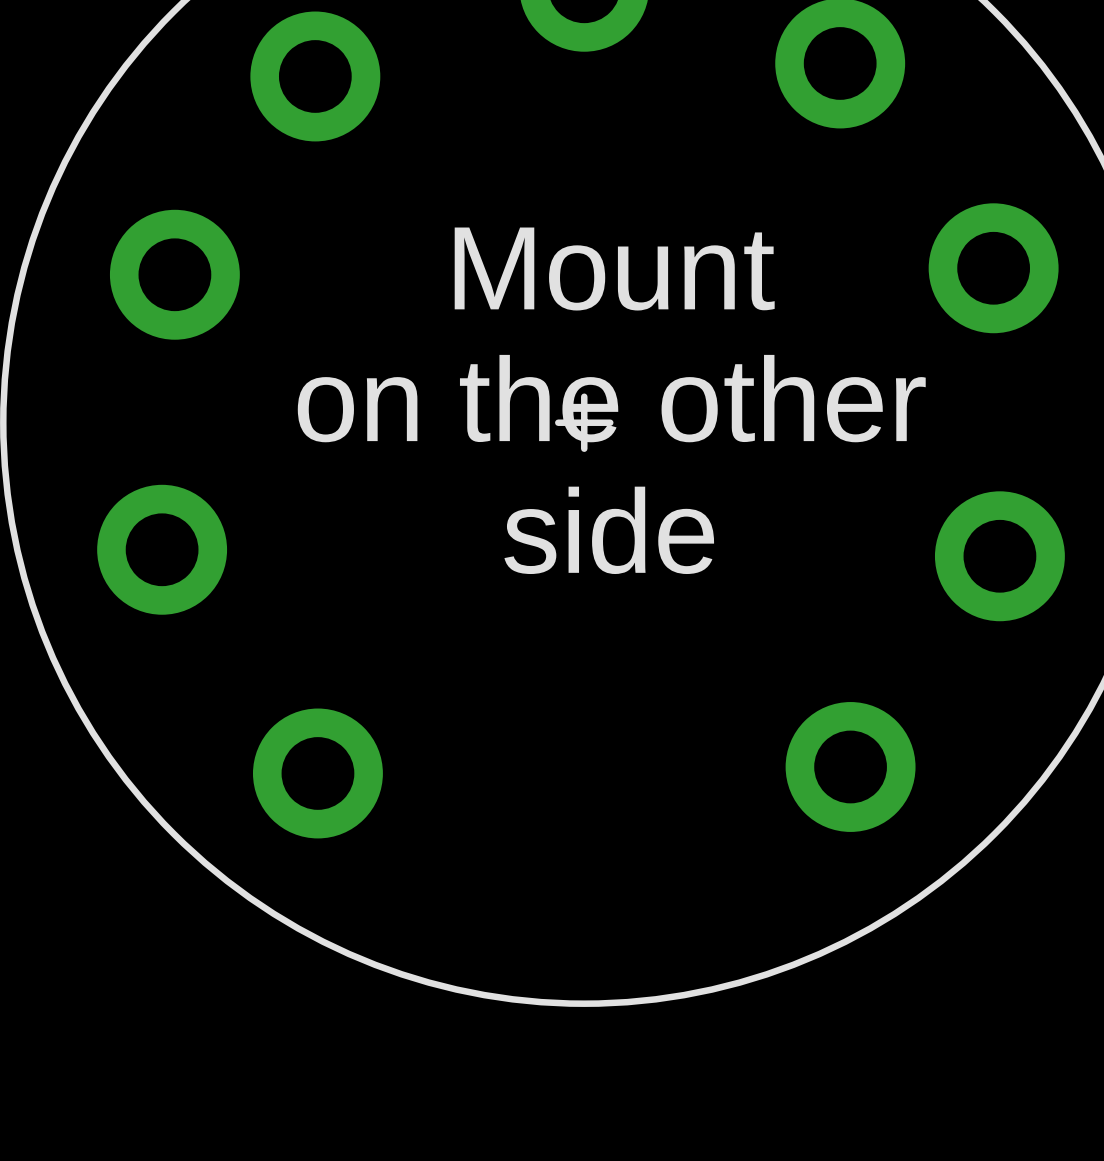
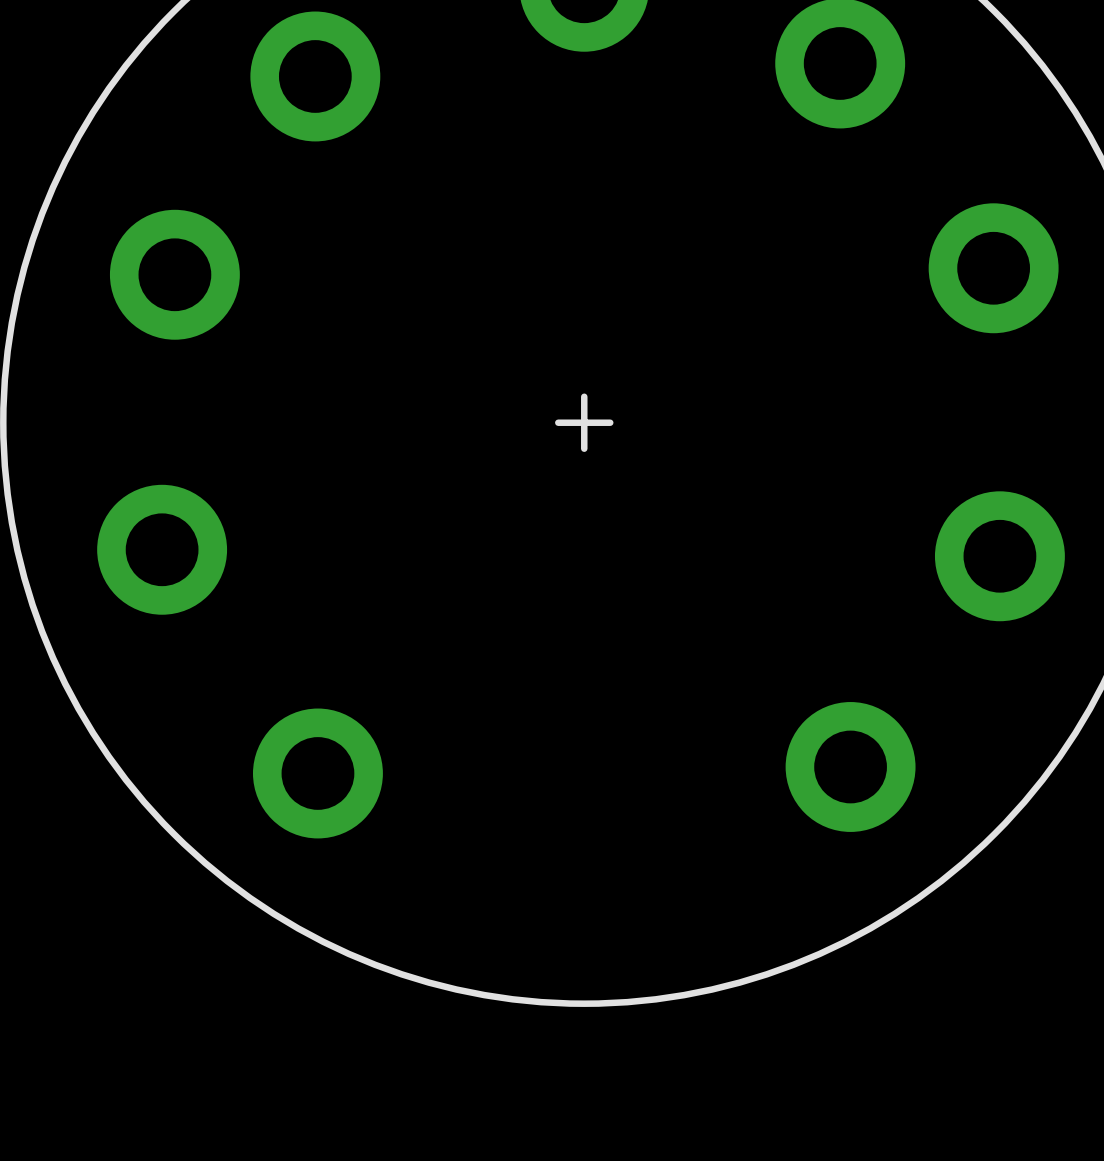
text: Mount (614, 269) -> none
text: on the other (611, 398) -> none
text: side (609, 530) -> none

